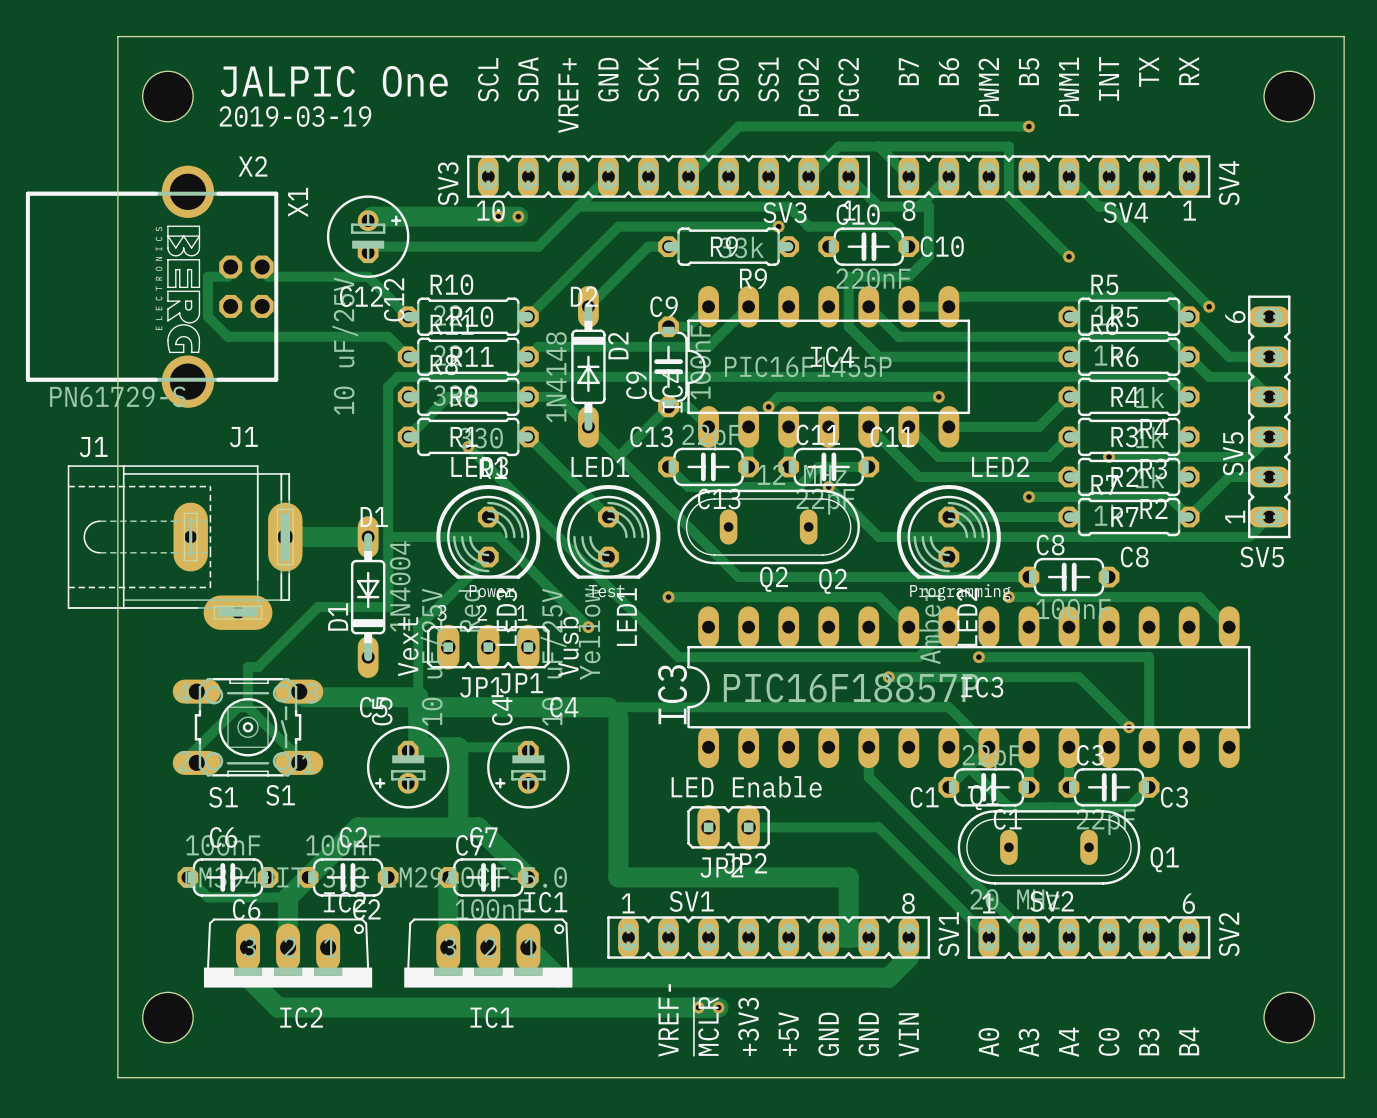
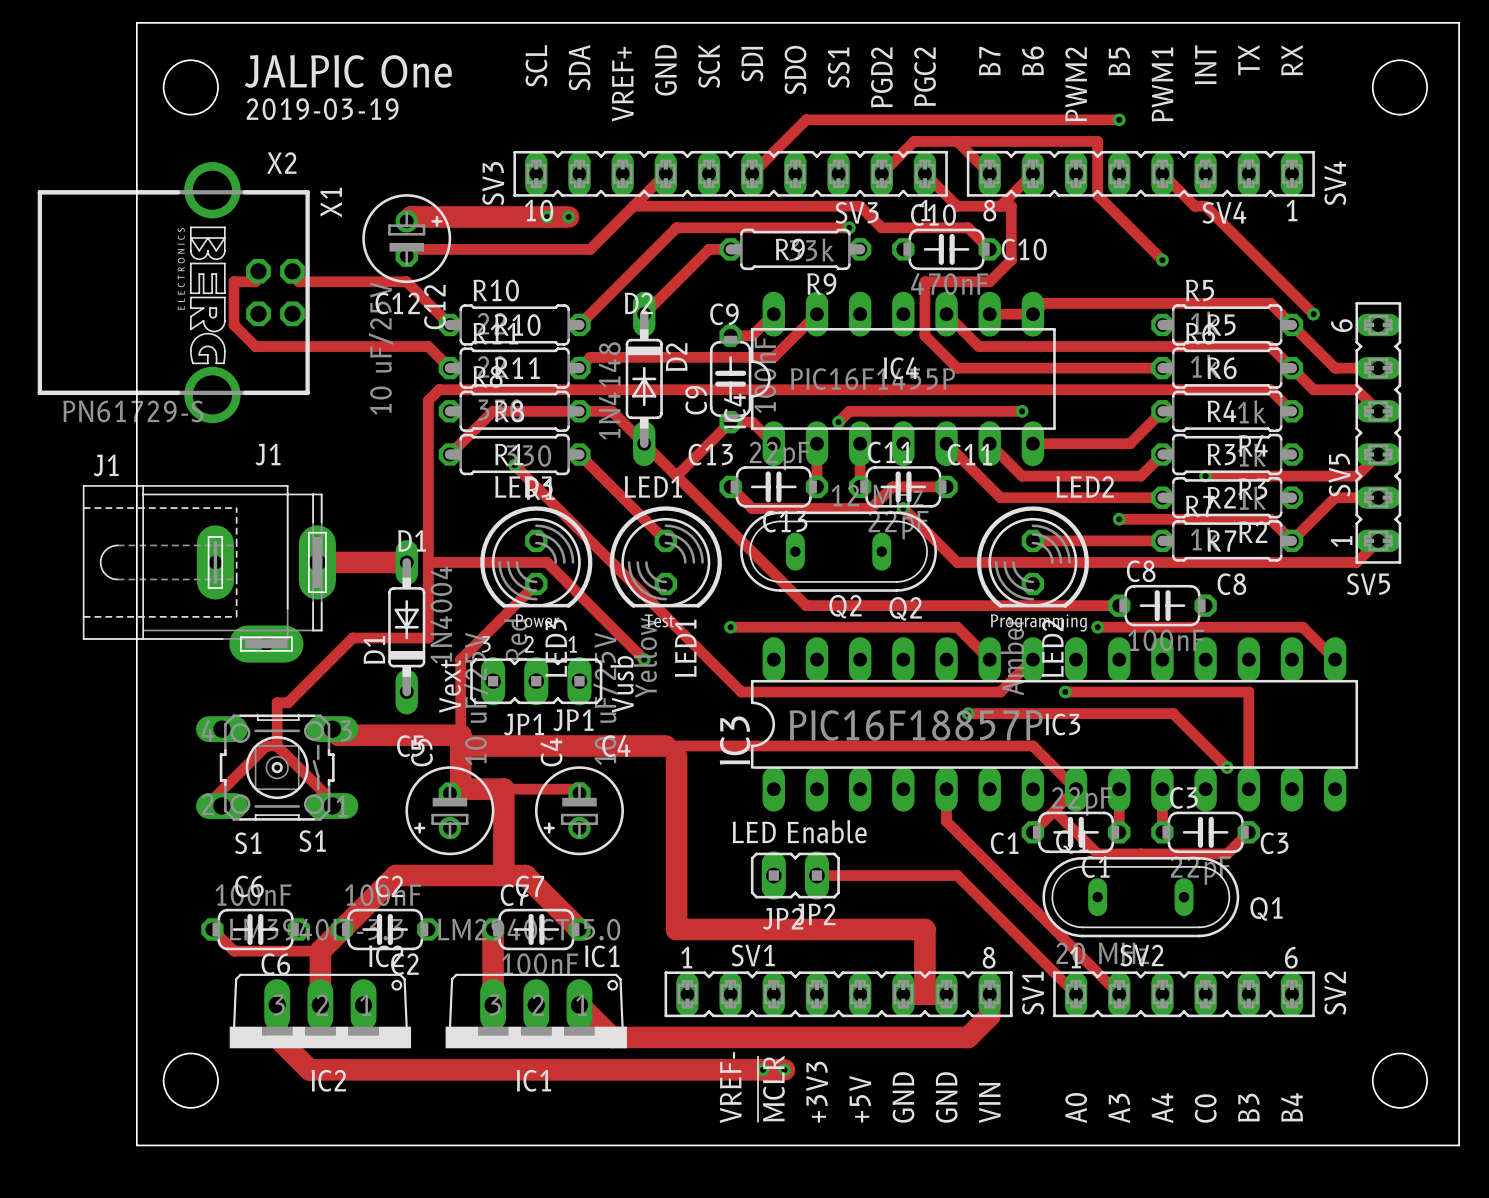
C10 value: 220nF (873, 278) -> 470nF (949, 284)

